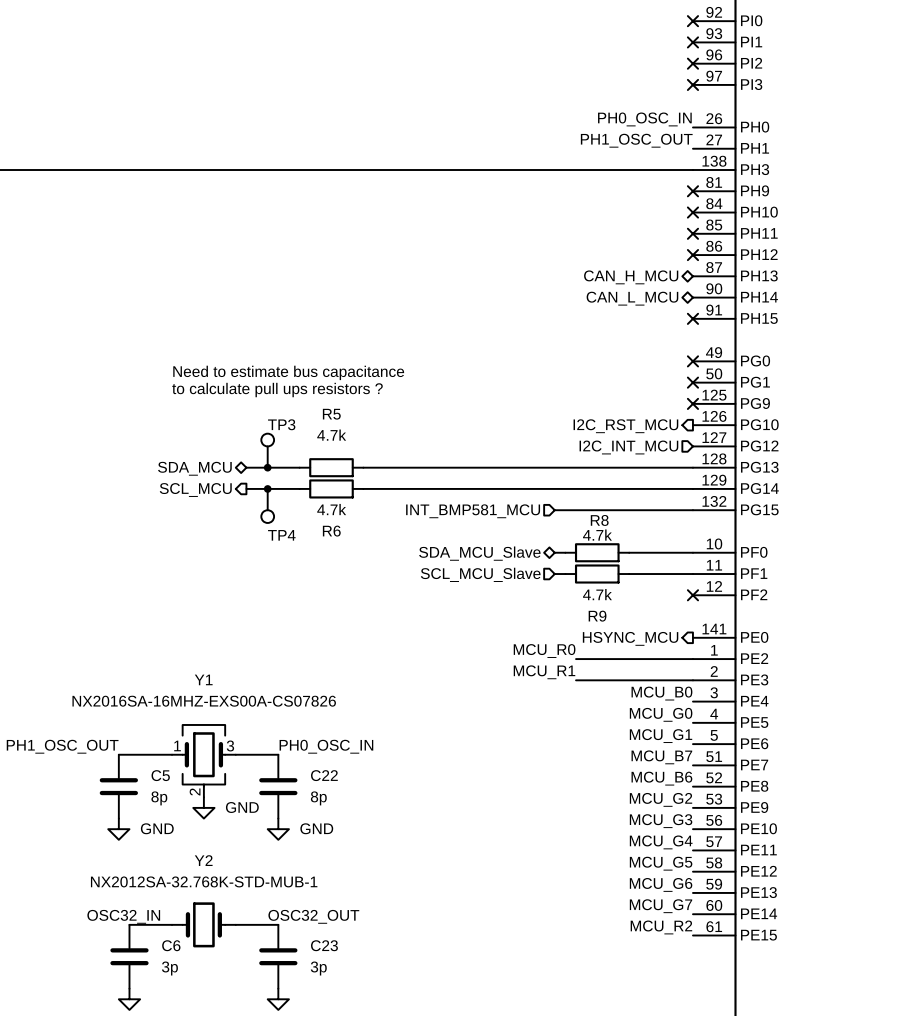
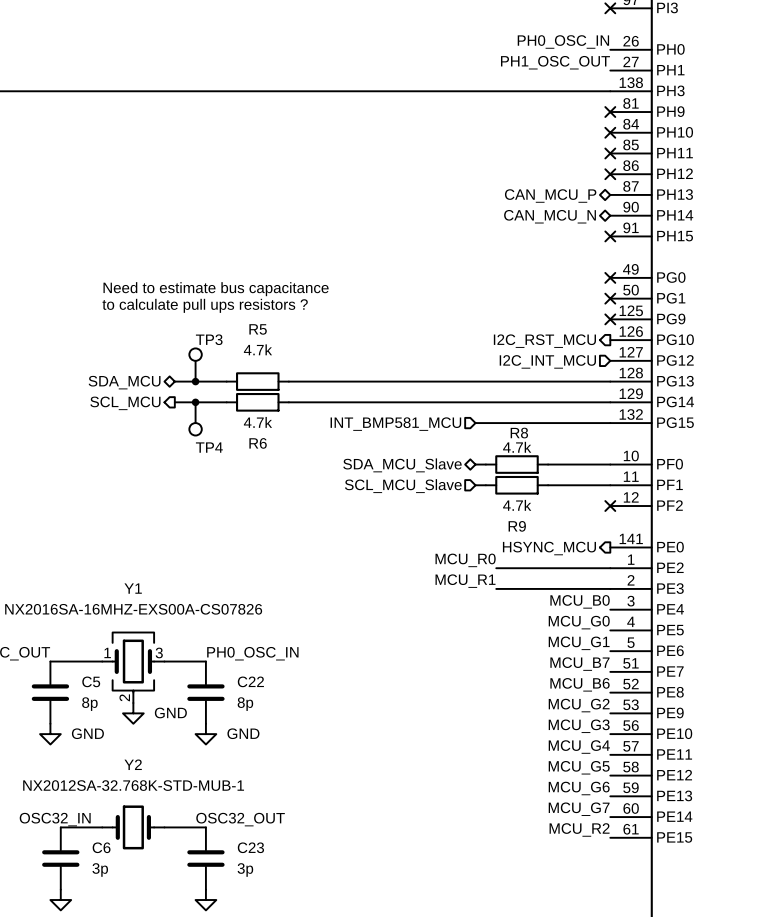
hierarchical label: CAN_H_MCU (631, 277) -> CAN_MCU_P (550, 195)
hierarchical label: CAN_L_MCU (632, 298) -> CAN_MCU_N (550, 216)

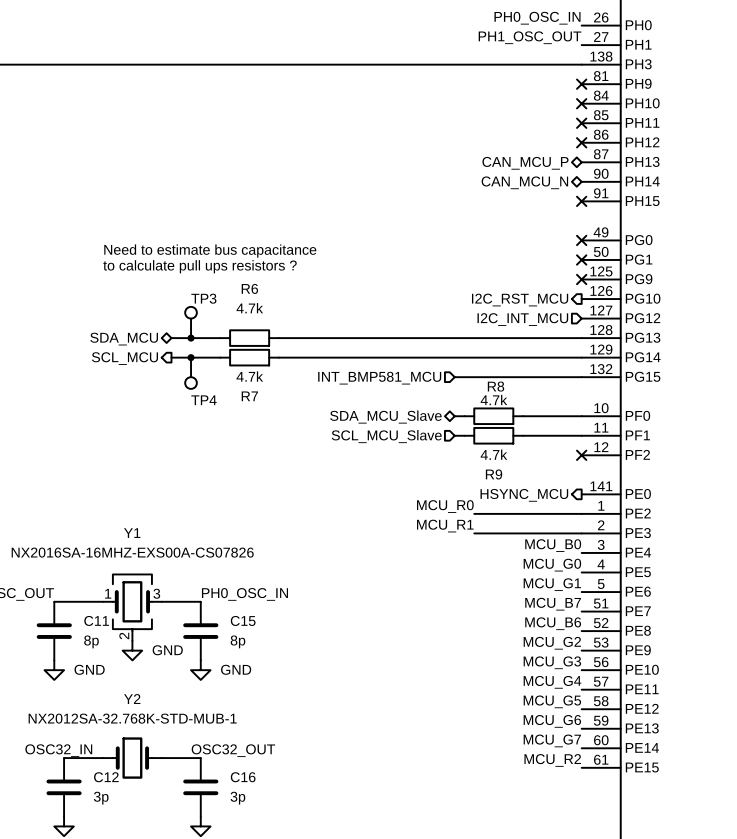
R5 name: R5 (258, 329) -> R6 (249, 288)
R6 name: R6 (258, 443) -> R7 (249, 396)
C5 name: C5 (91, 681) -> C11 (96, 620)
C22 name: C22 (250, 681) -> C15 (243, 620)
C6 name: C6 (101, 847) -> C12 (106, 777)
C23 name: C23 (250, 847) -> C16 (243, 777)

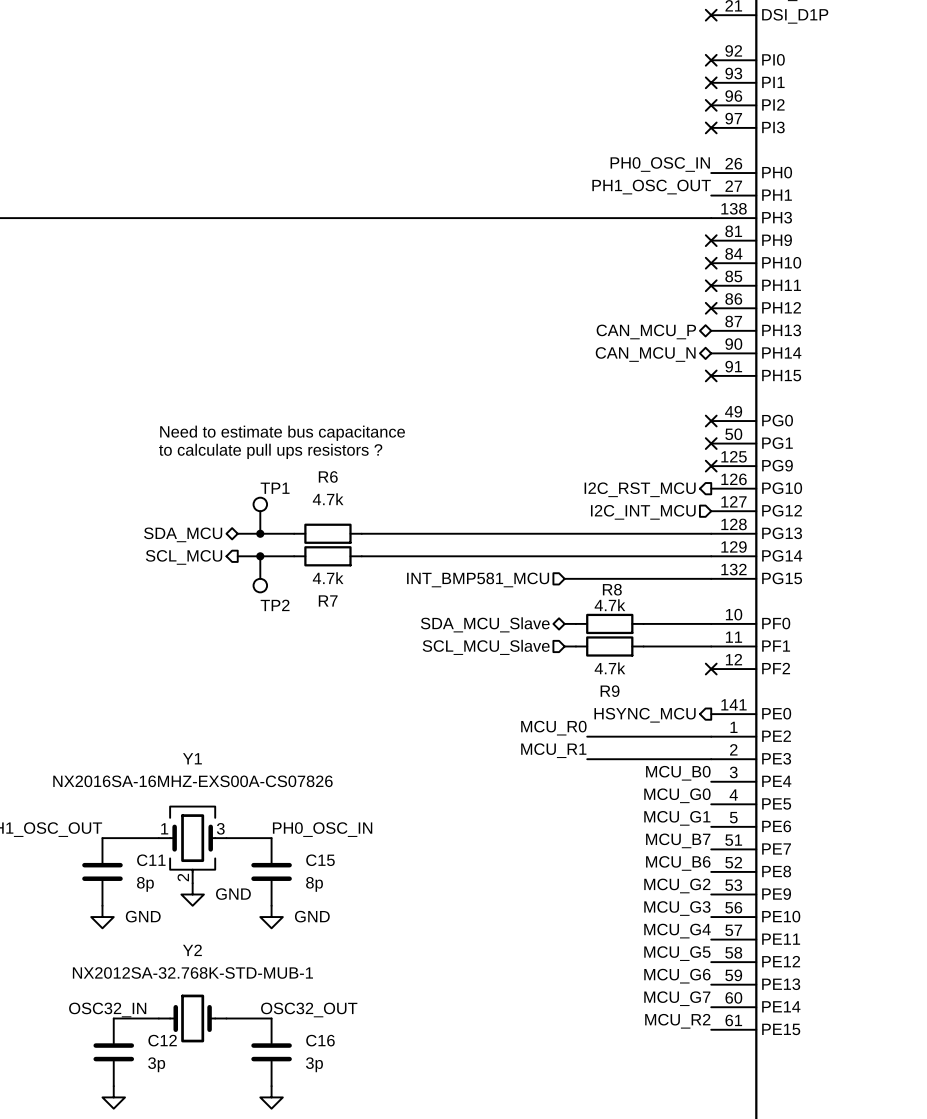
TP3 name: TP3 (203, 298) -> TP1 (275, 488)
TP4 name: TP4 (203, 400) -> TP2 (275, 605)

